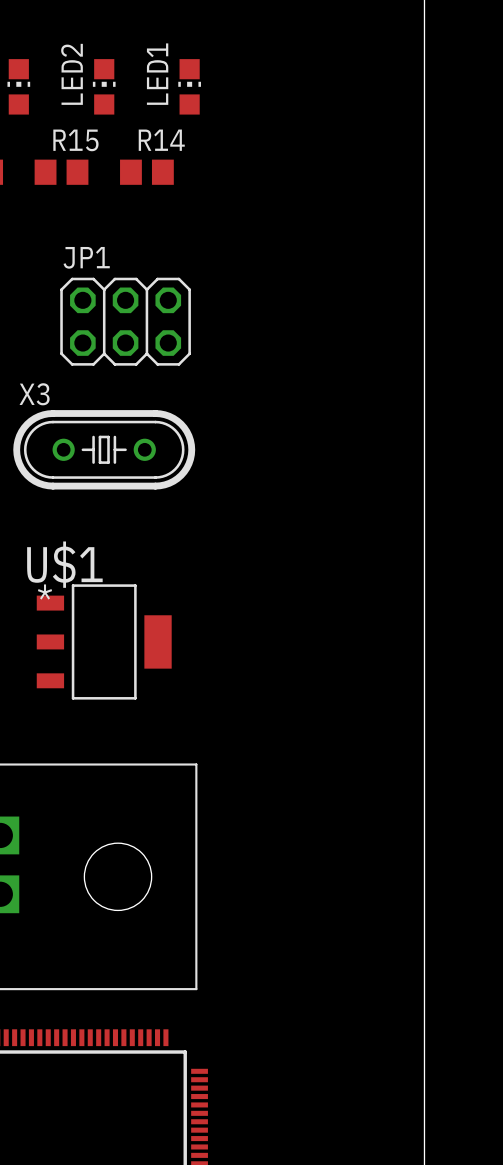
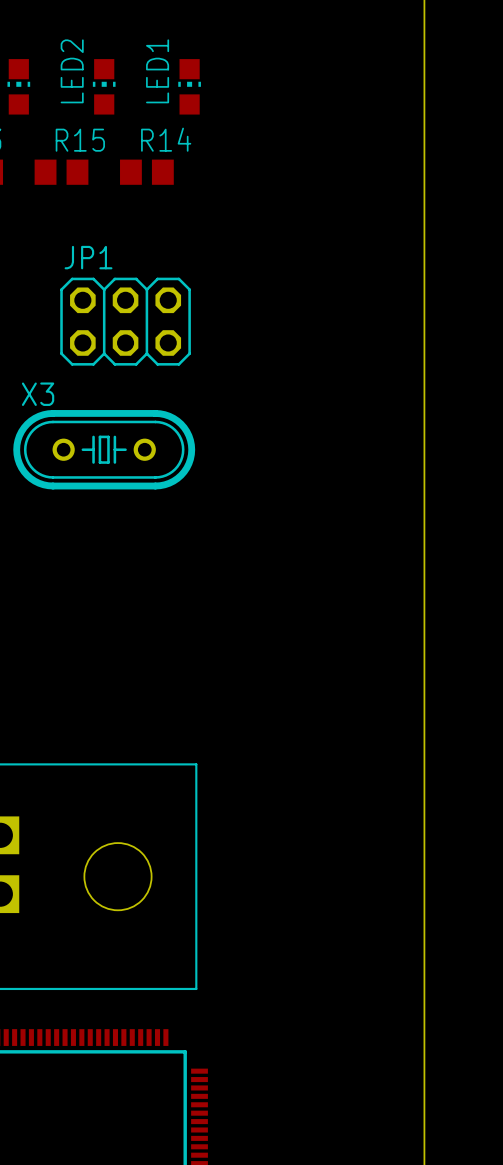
U$1: (104, 641) -> none

